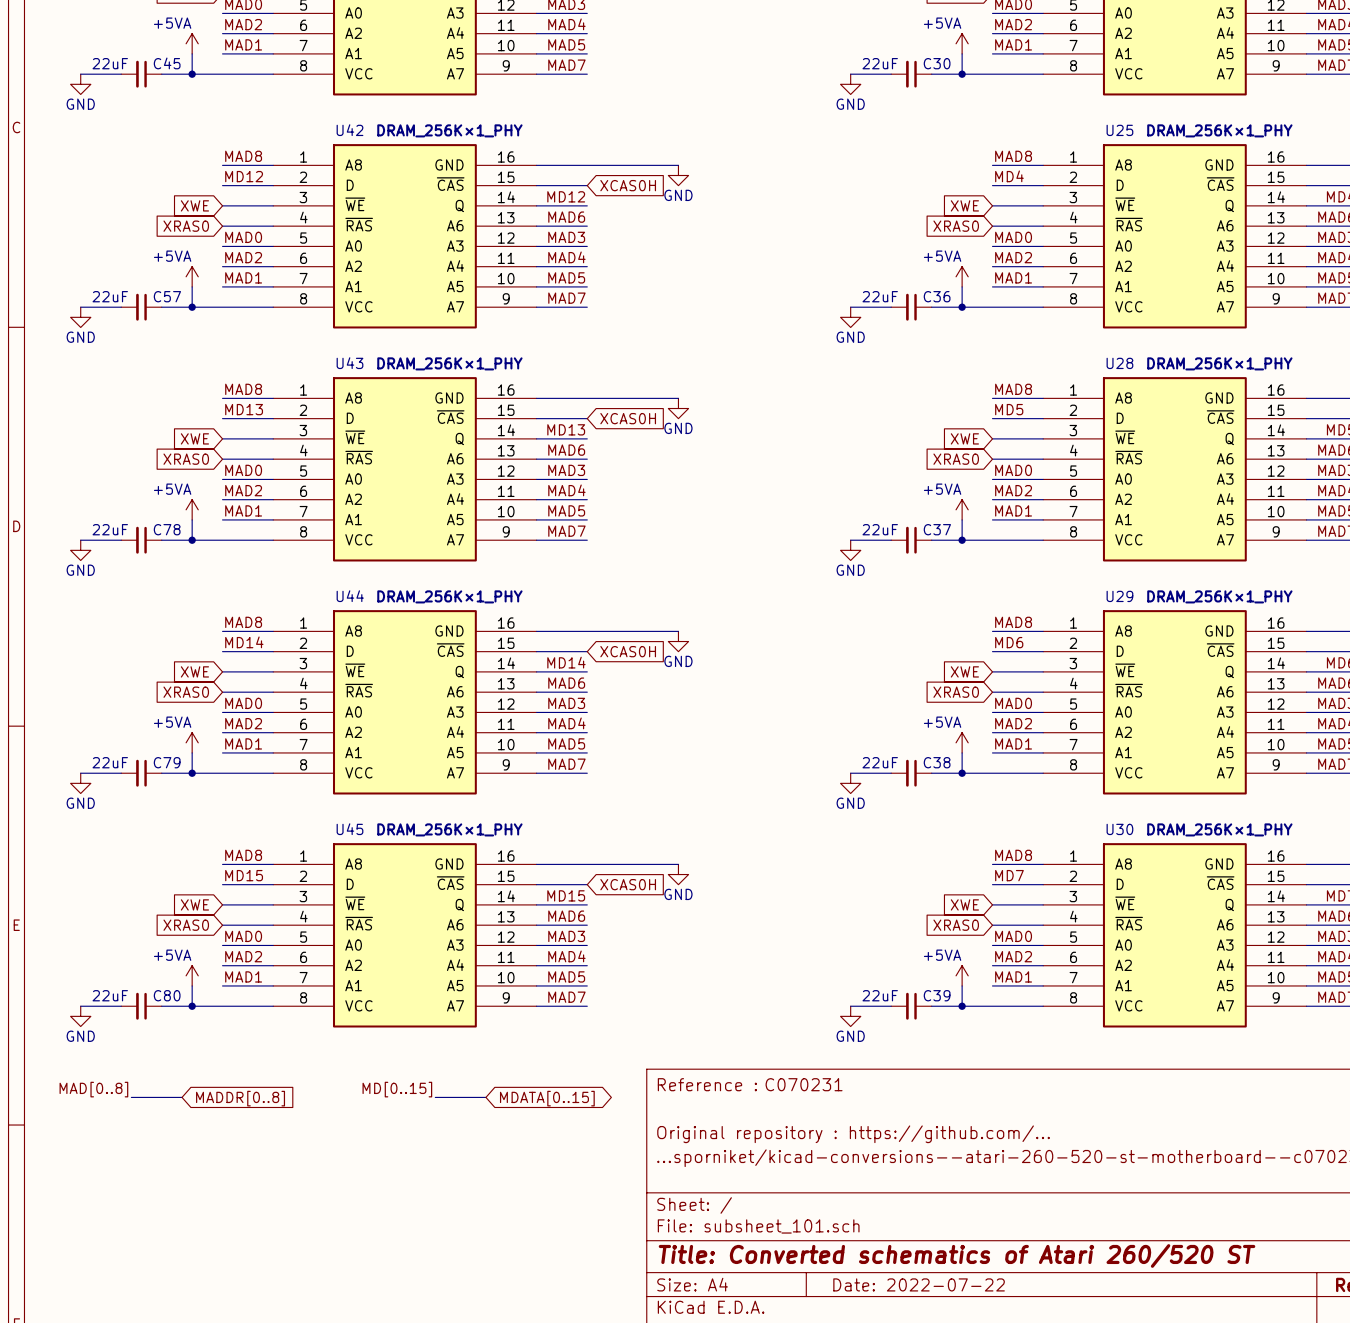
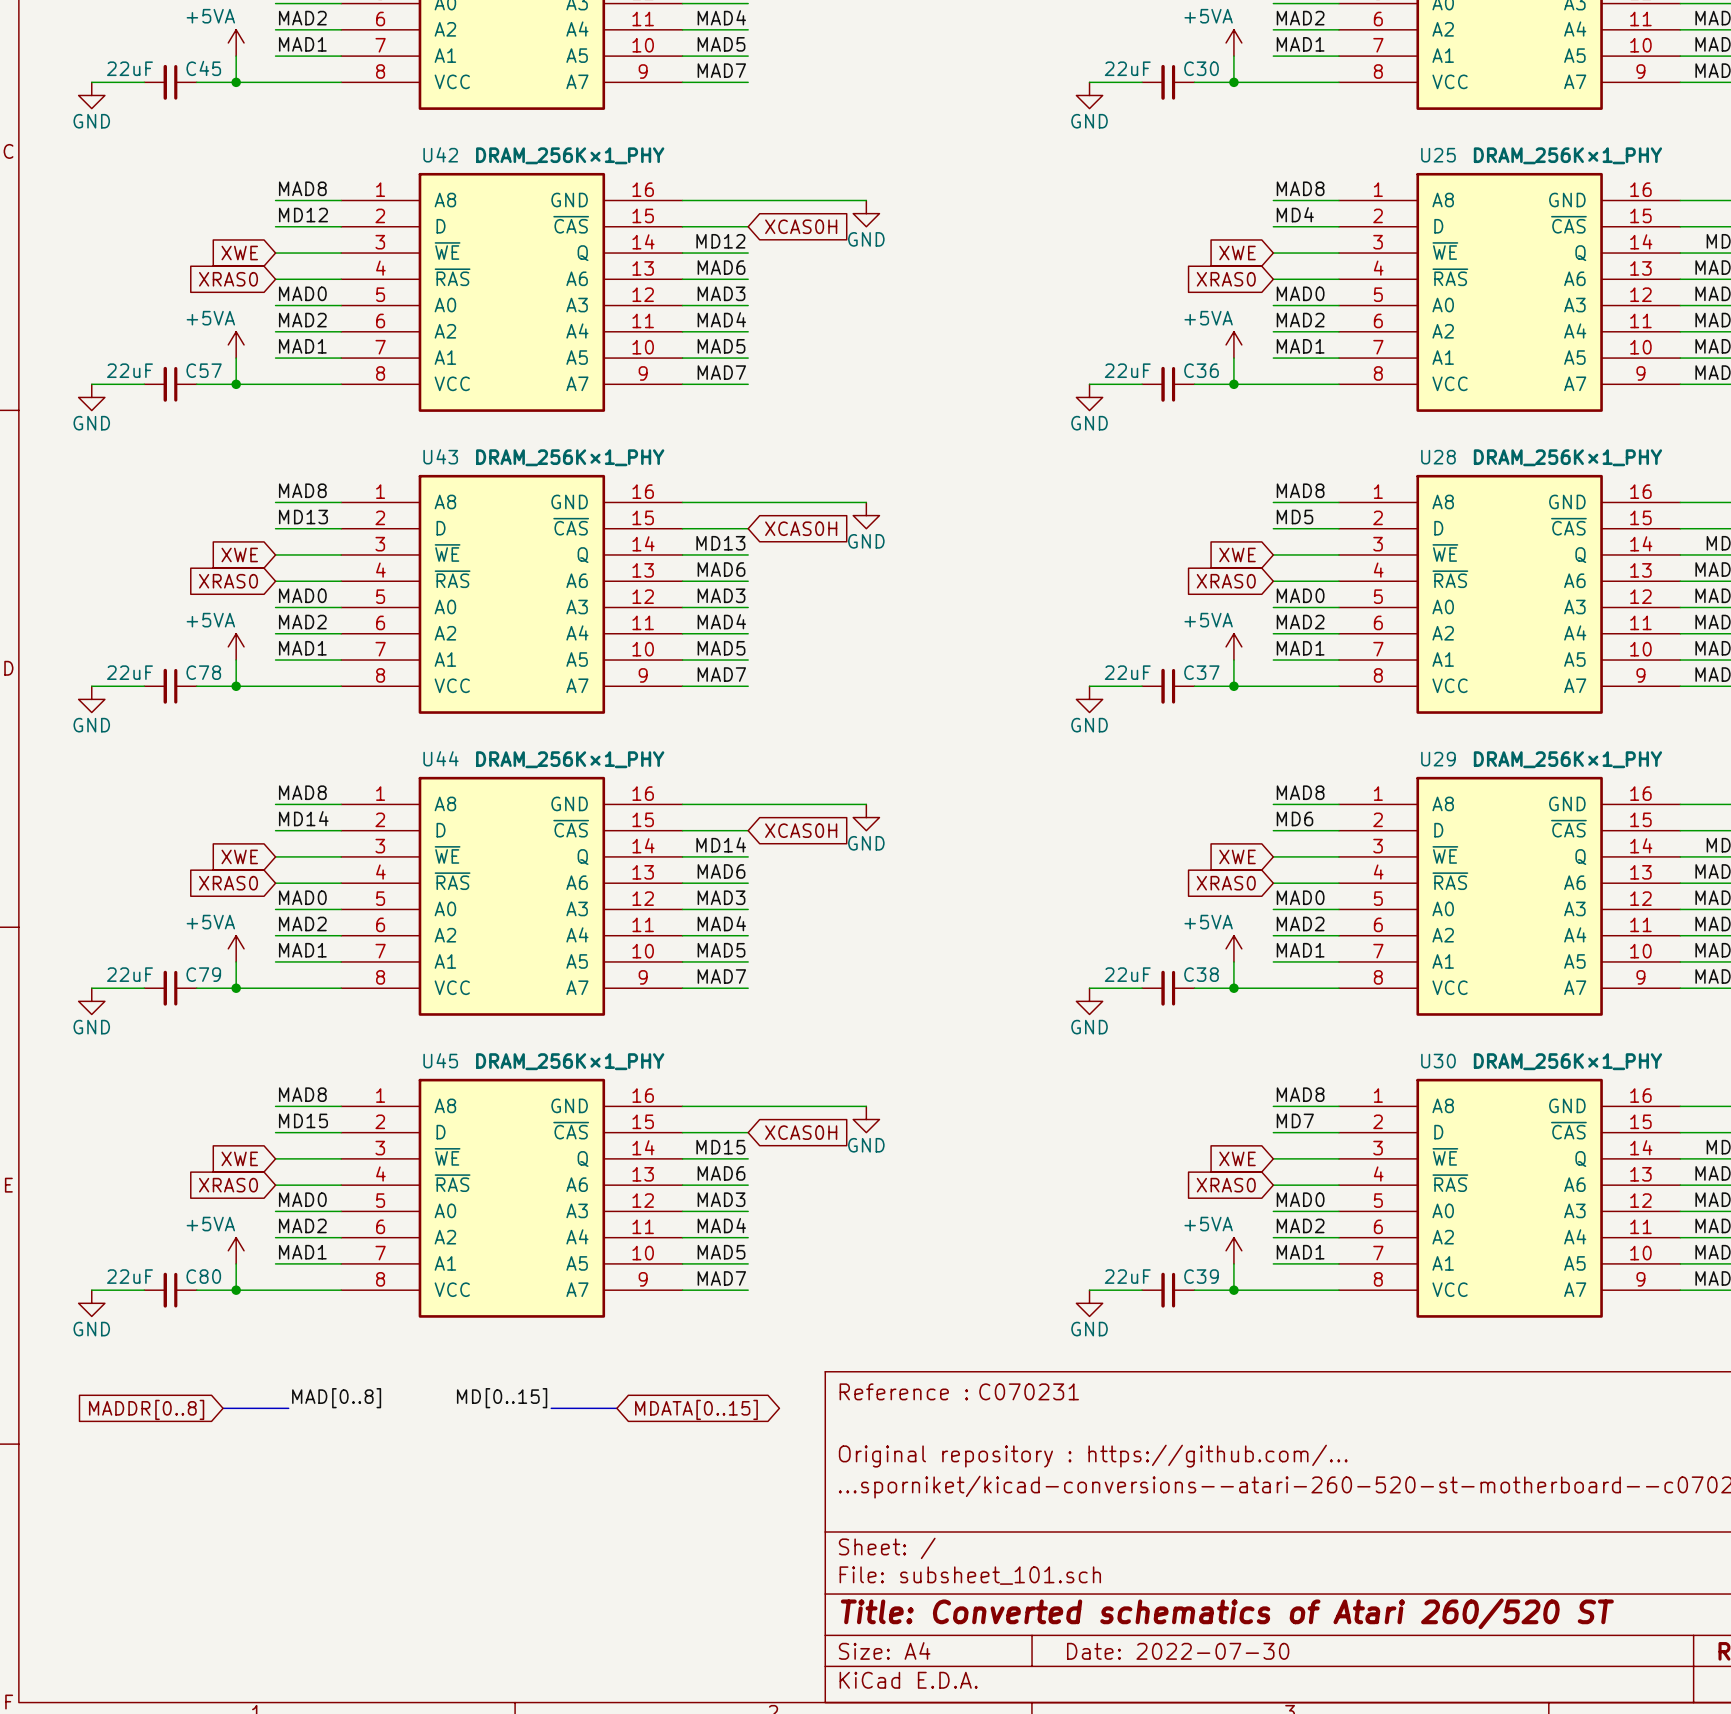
label position: MAD[0..8] (93, 1089) -> MAD[0..8] (336, 1398)
bus: (131, 1097) (182, 1097) -> (288, 1408) (223, 1408)
global label rotation: 0° (240, 1098) -> 180° (146, 1409)
global label position: MADDR[0..8] (240, 1098) -> MADDR[0..8] (146, 1409)
title block: Date: 2022-07-22 (919, 1284) -> Date: 2022-07-30 (1178, 1651)

